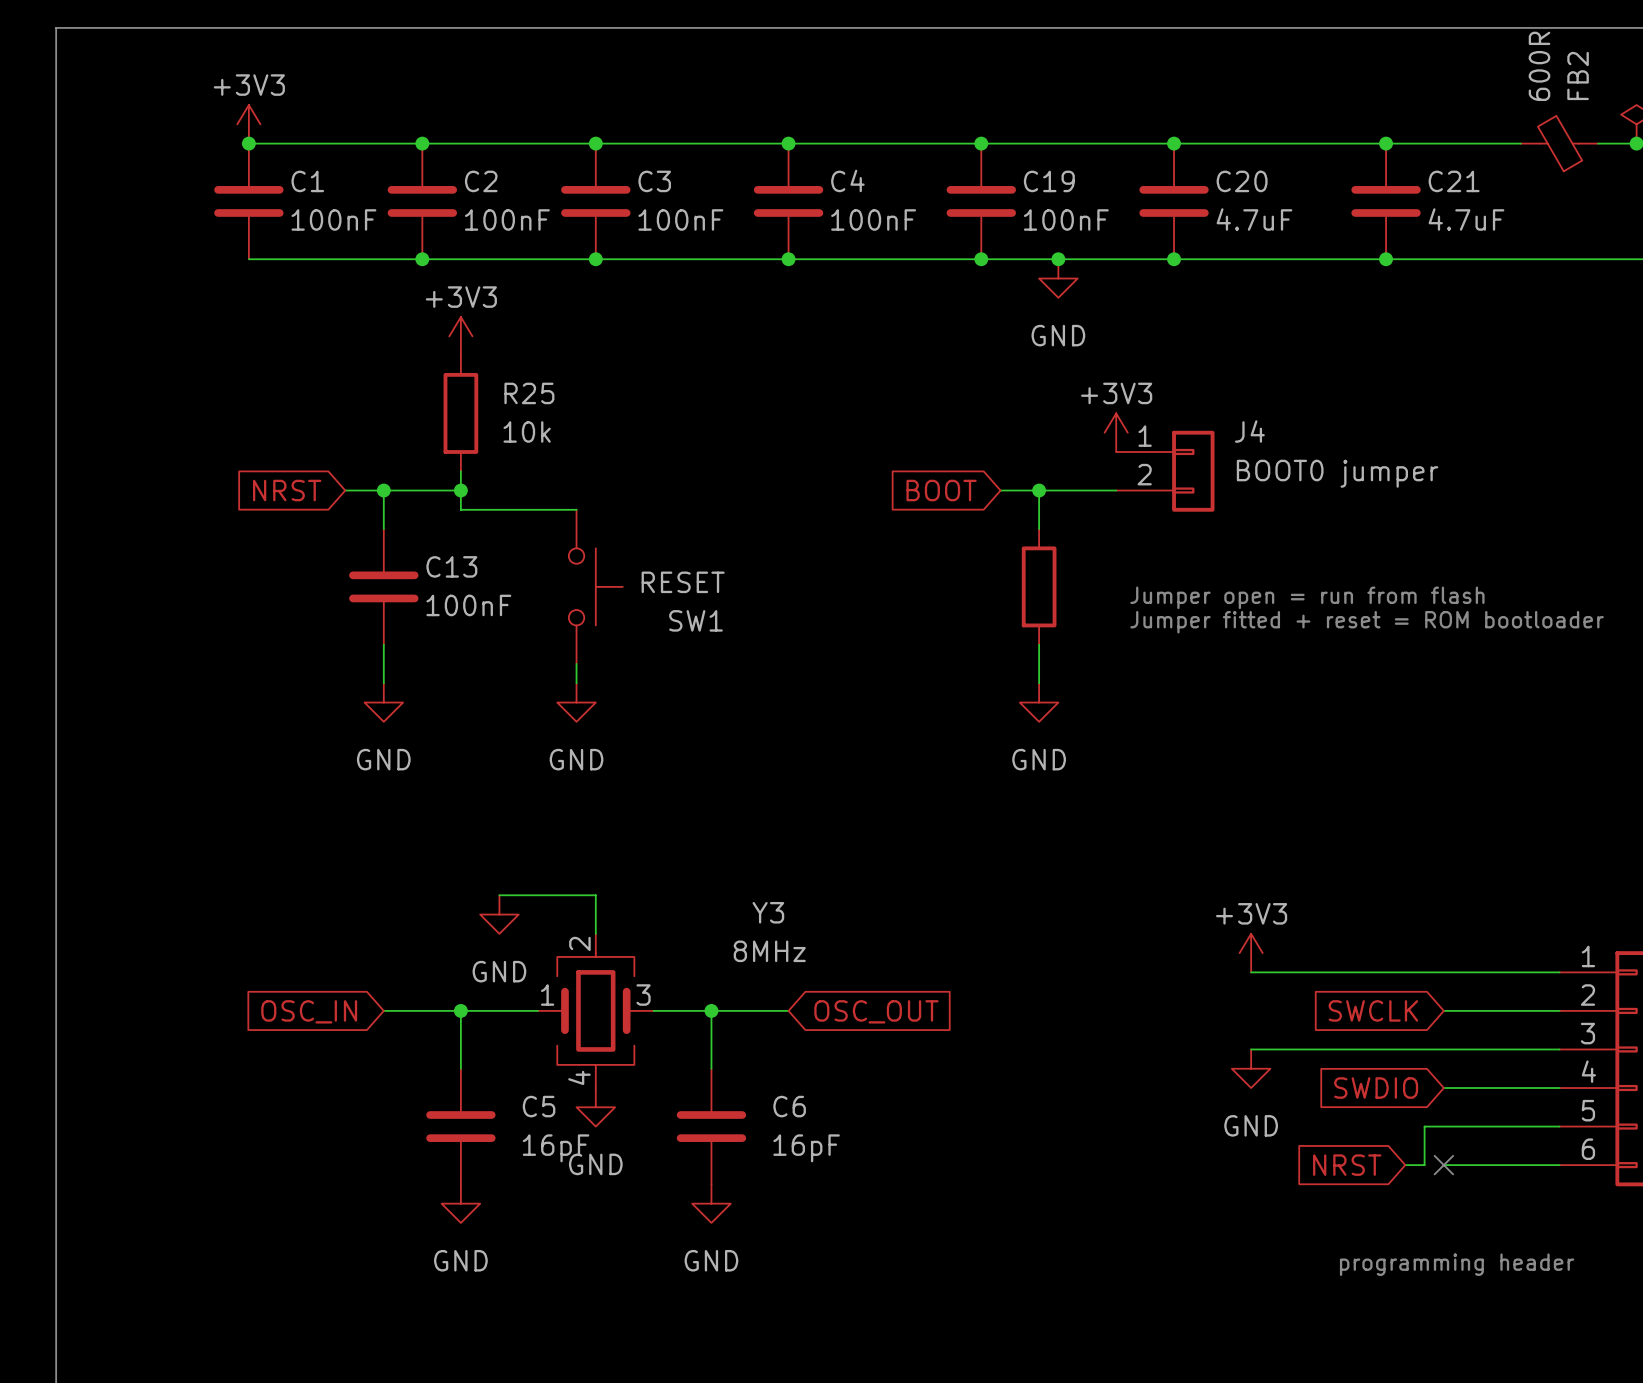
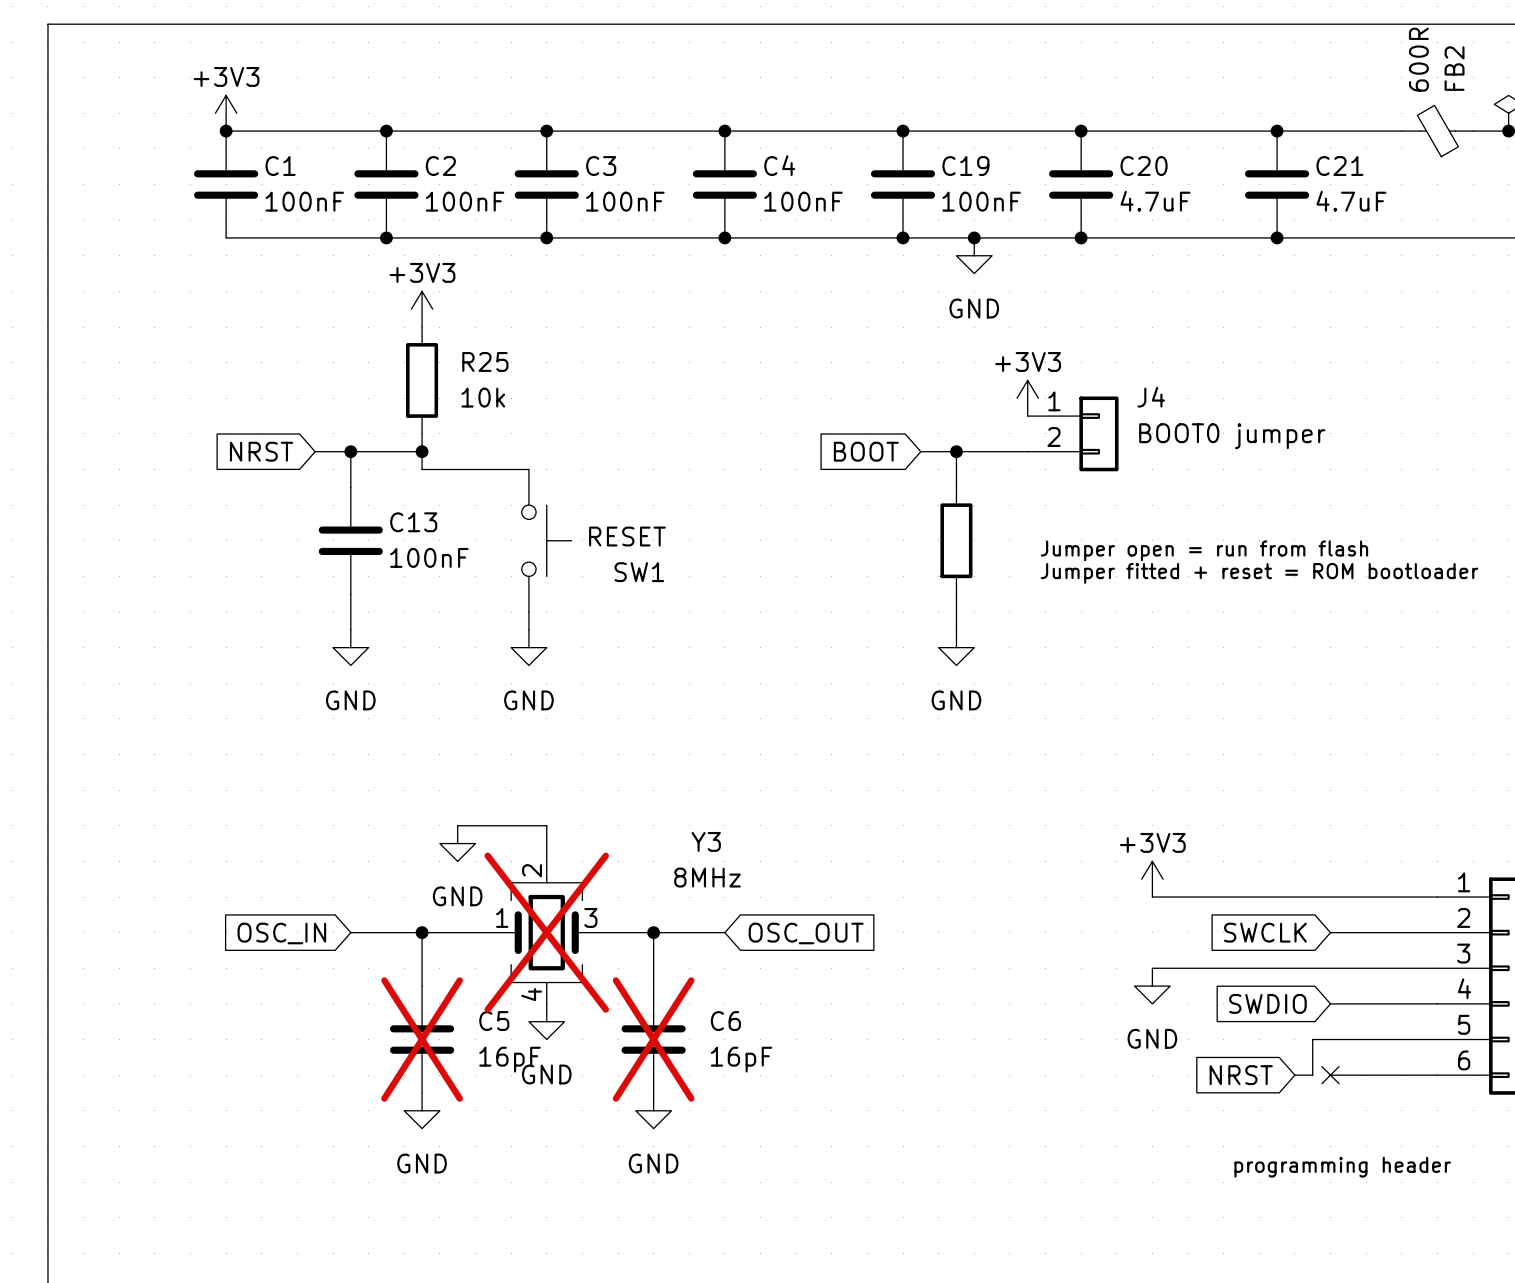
Y3 do-not-place cross: none -> (546, 932)
C5 do-not-place cross: none -> (422, 1039)
C6 do-not-place cross: none -> (653, 1039)

